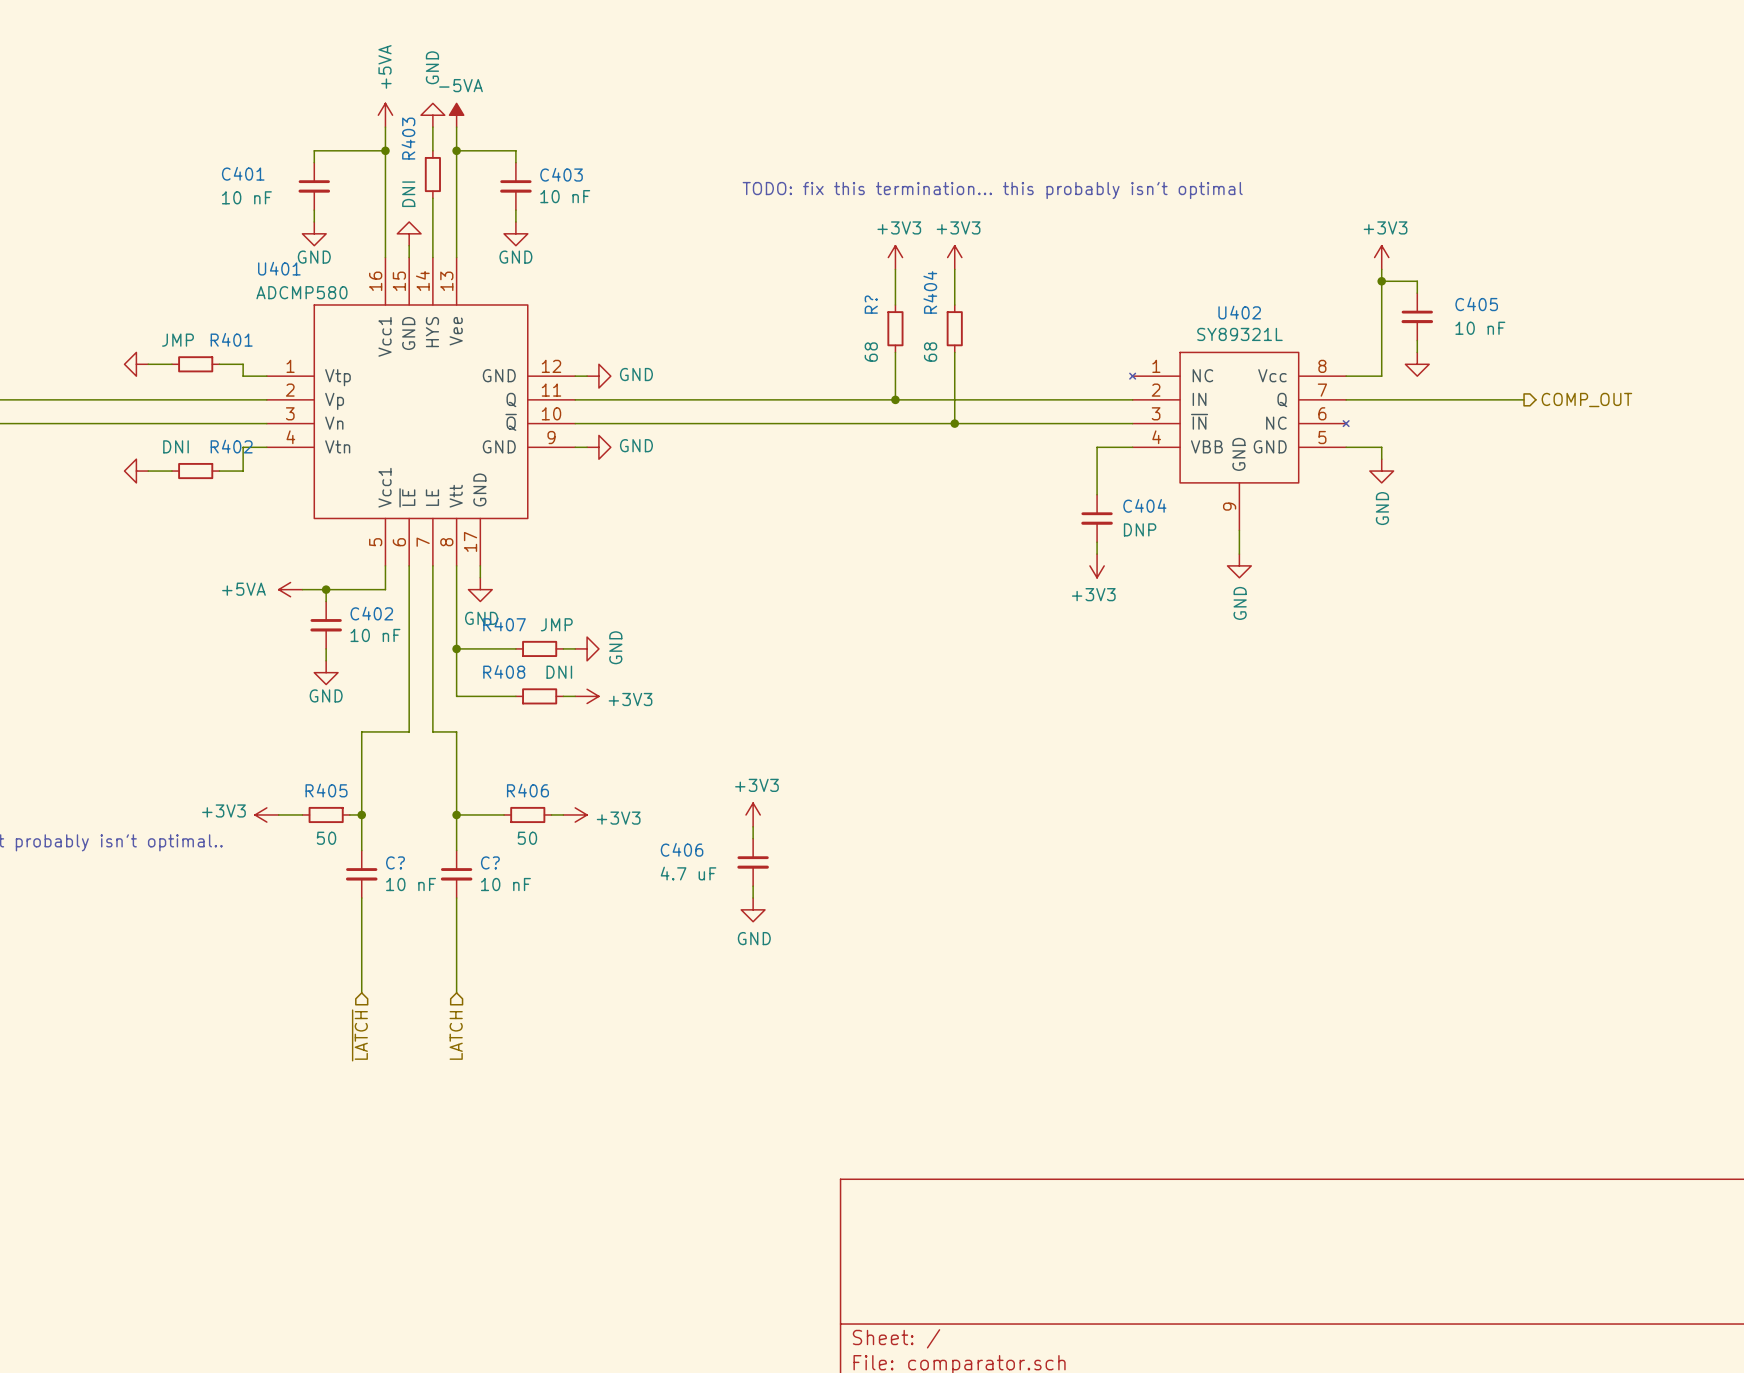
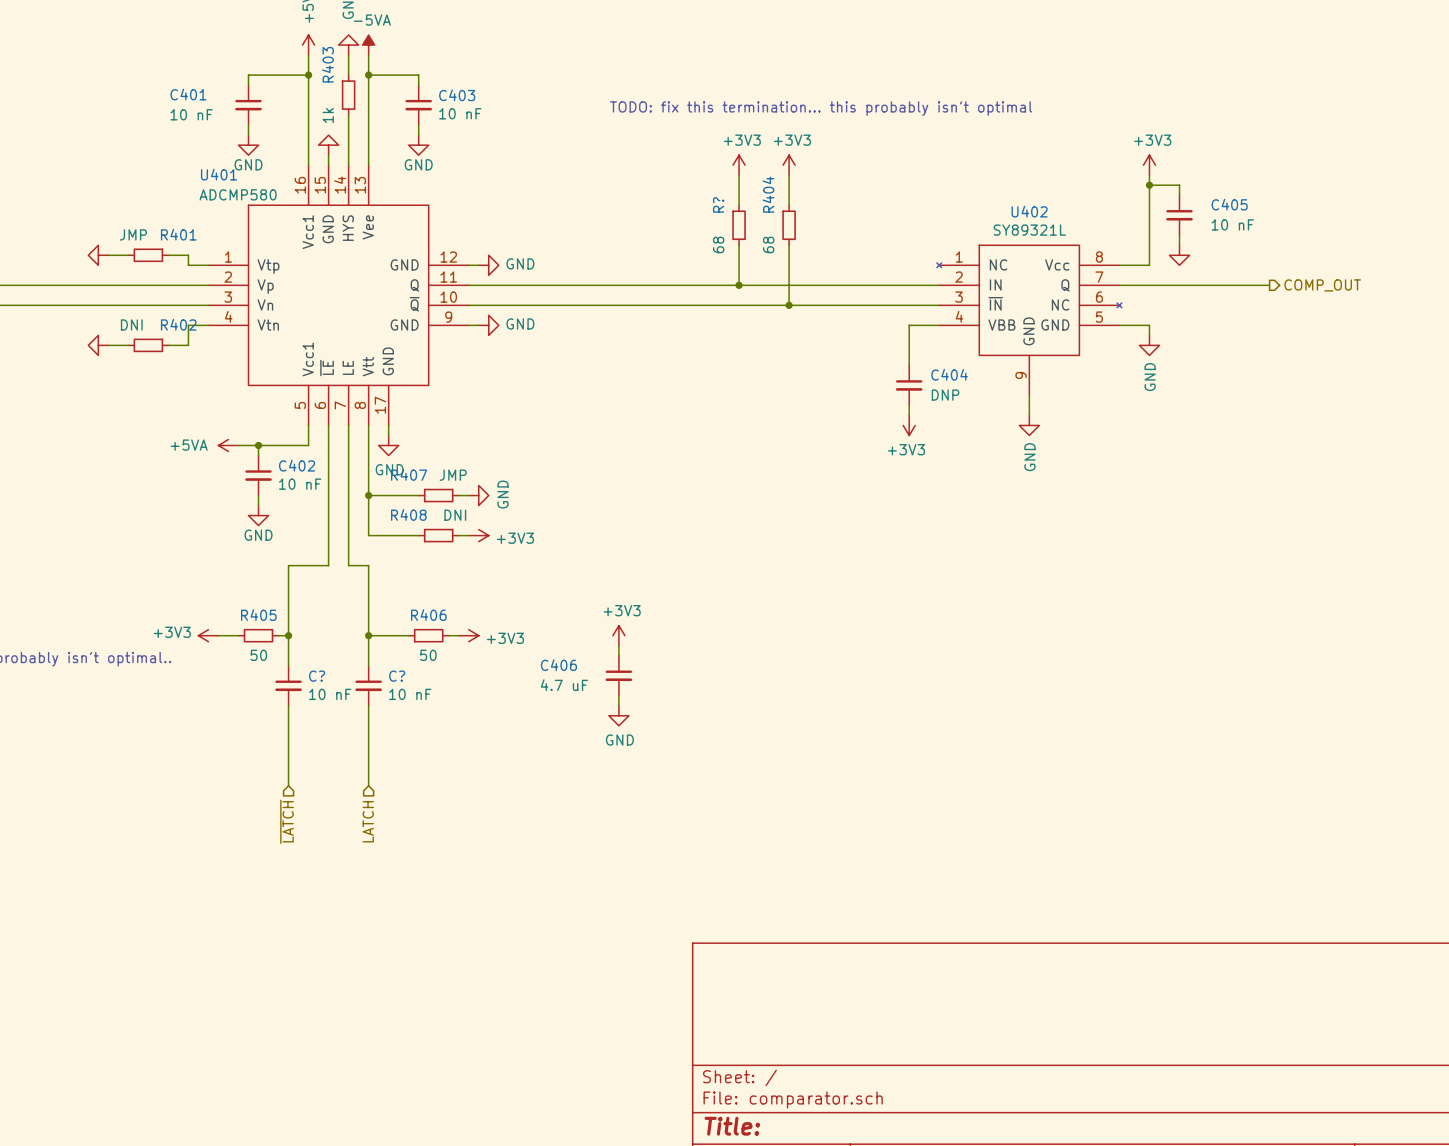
R403 value: DNI (408, 194) -> 1k (328, 115)

